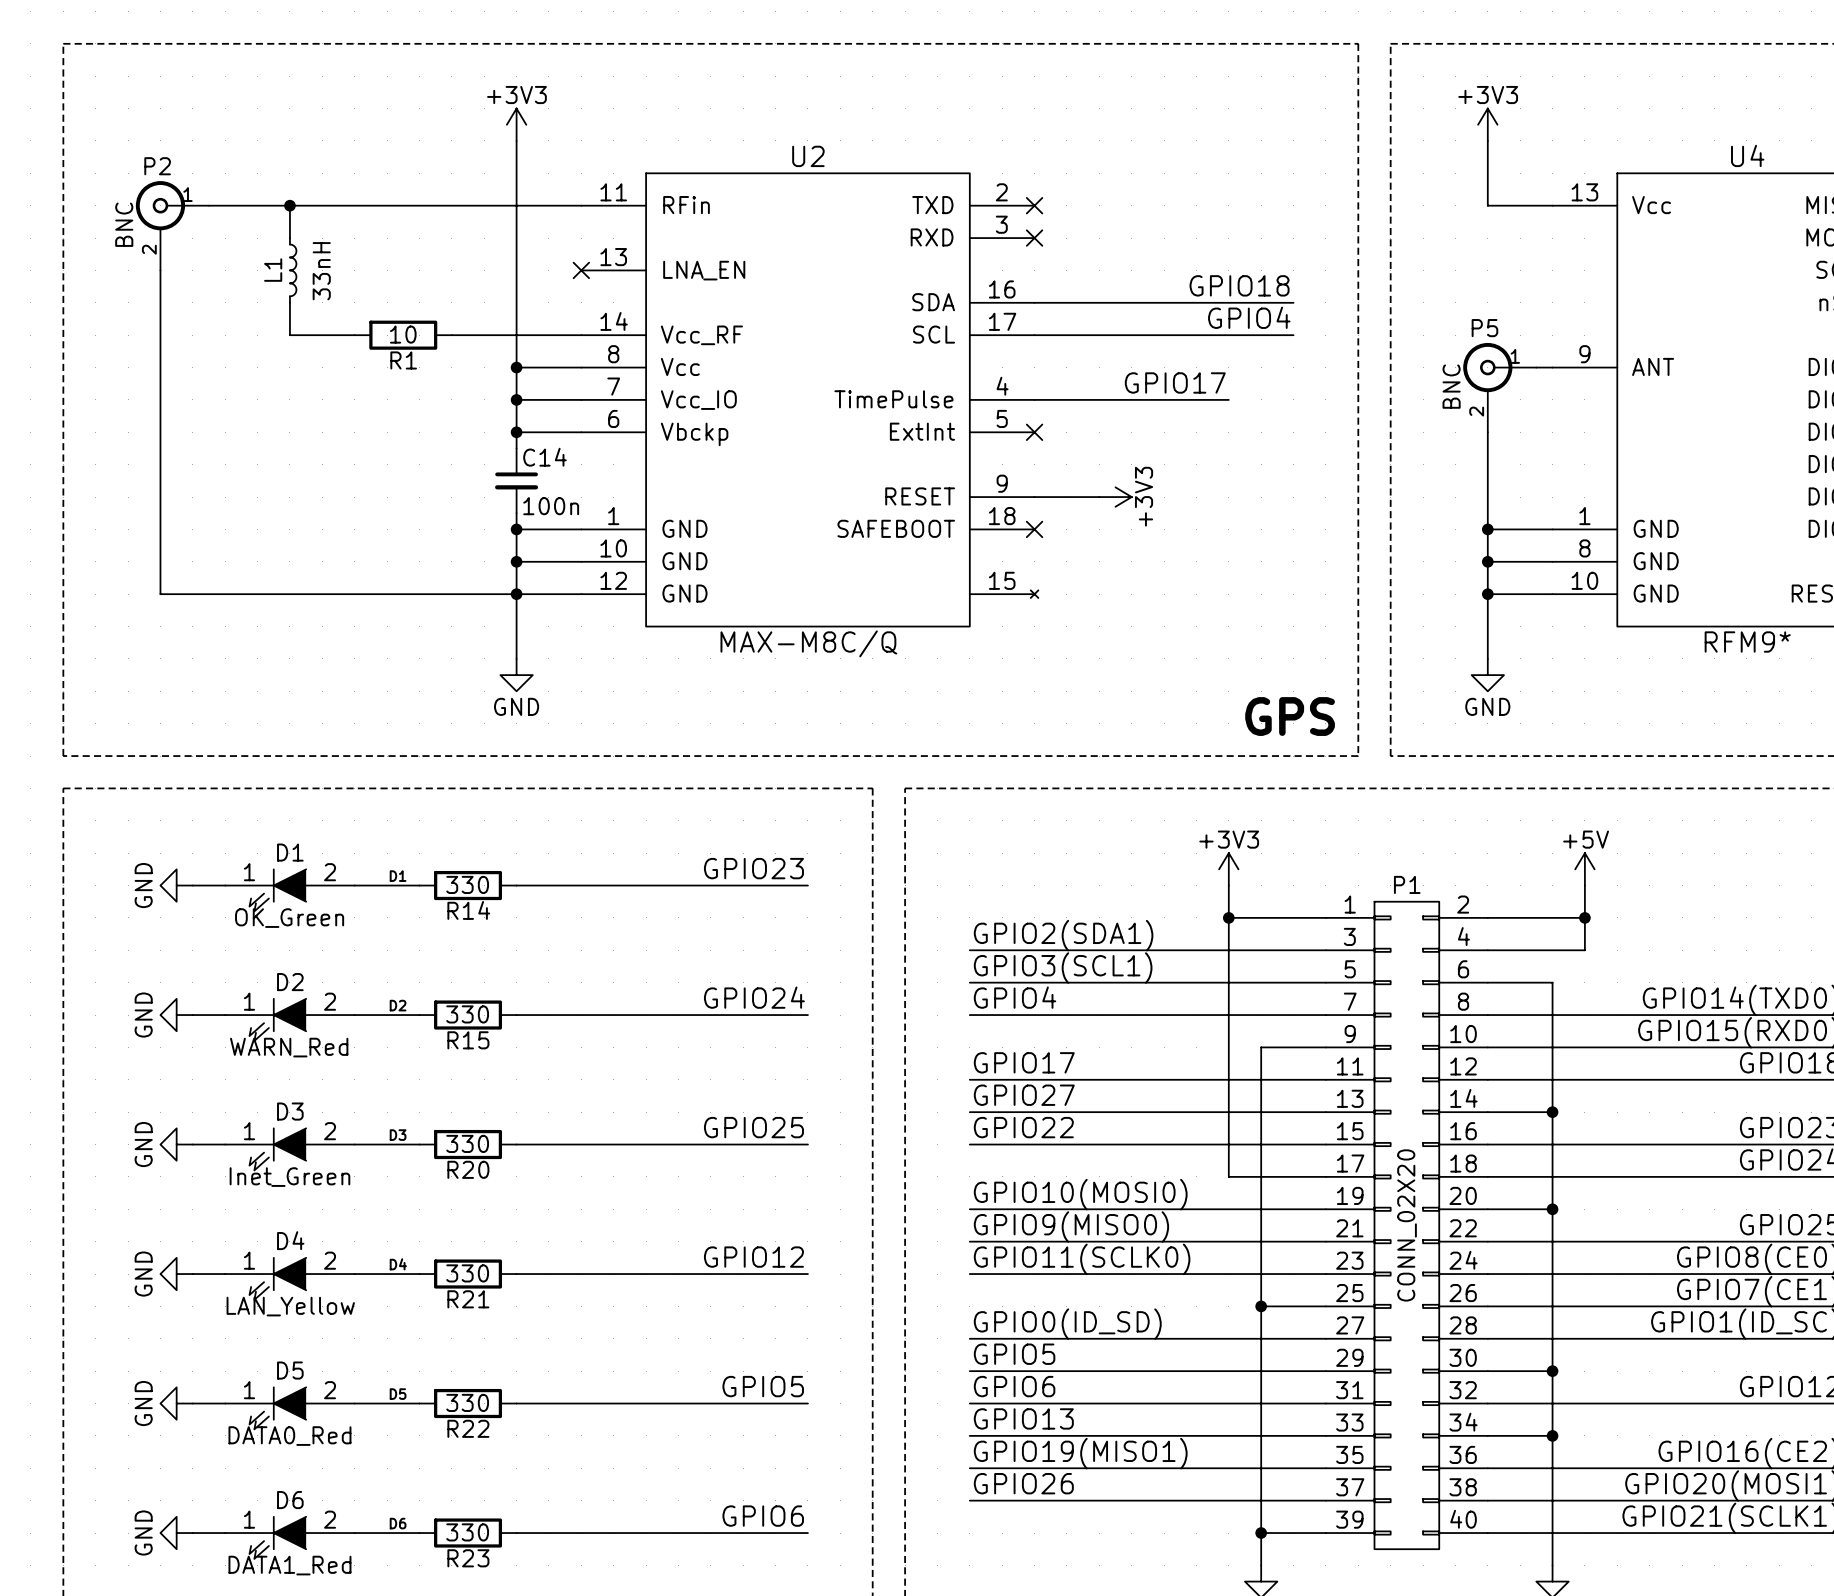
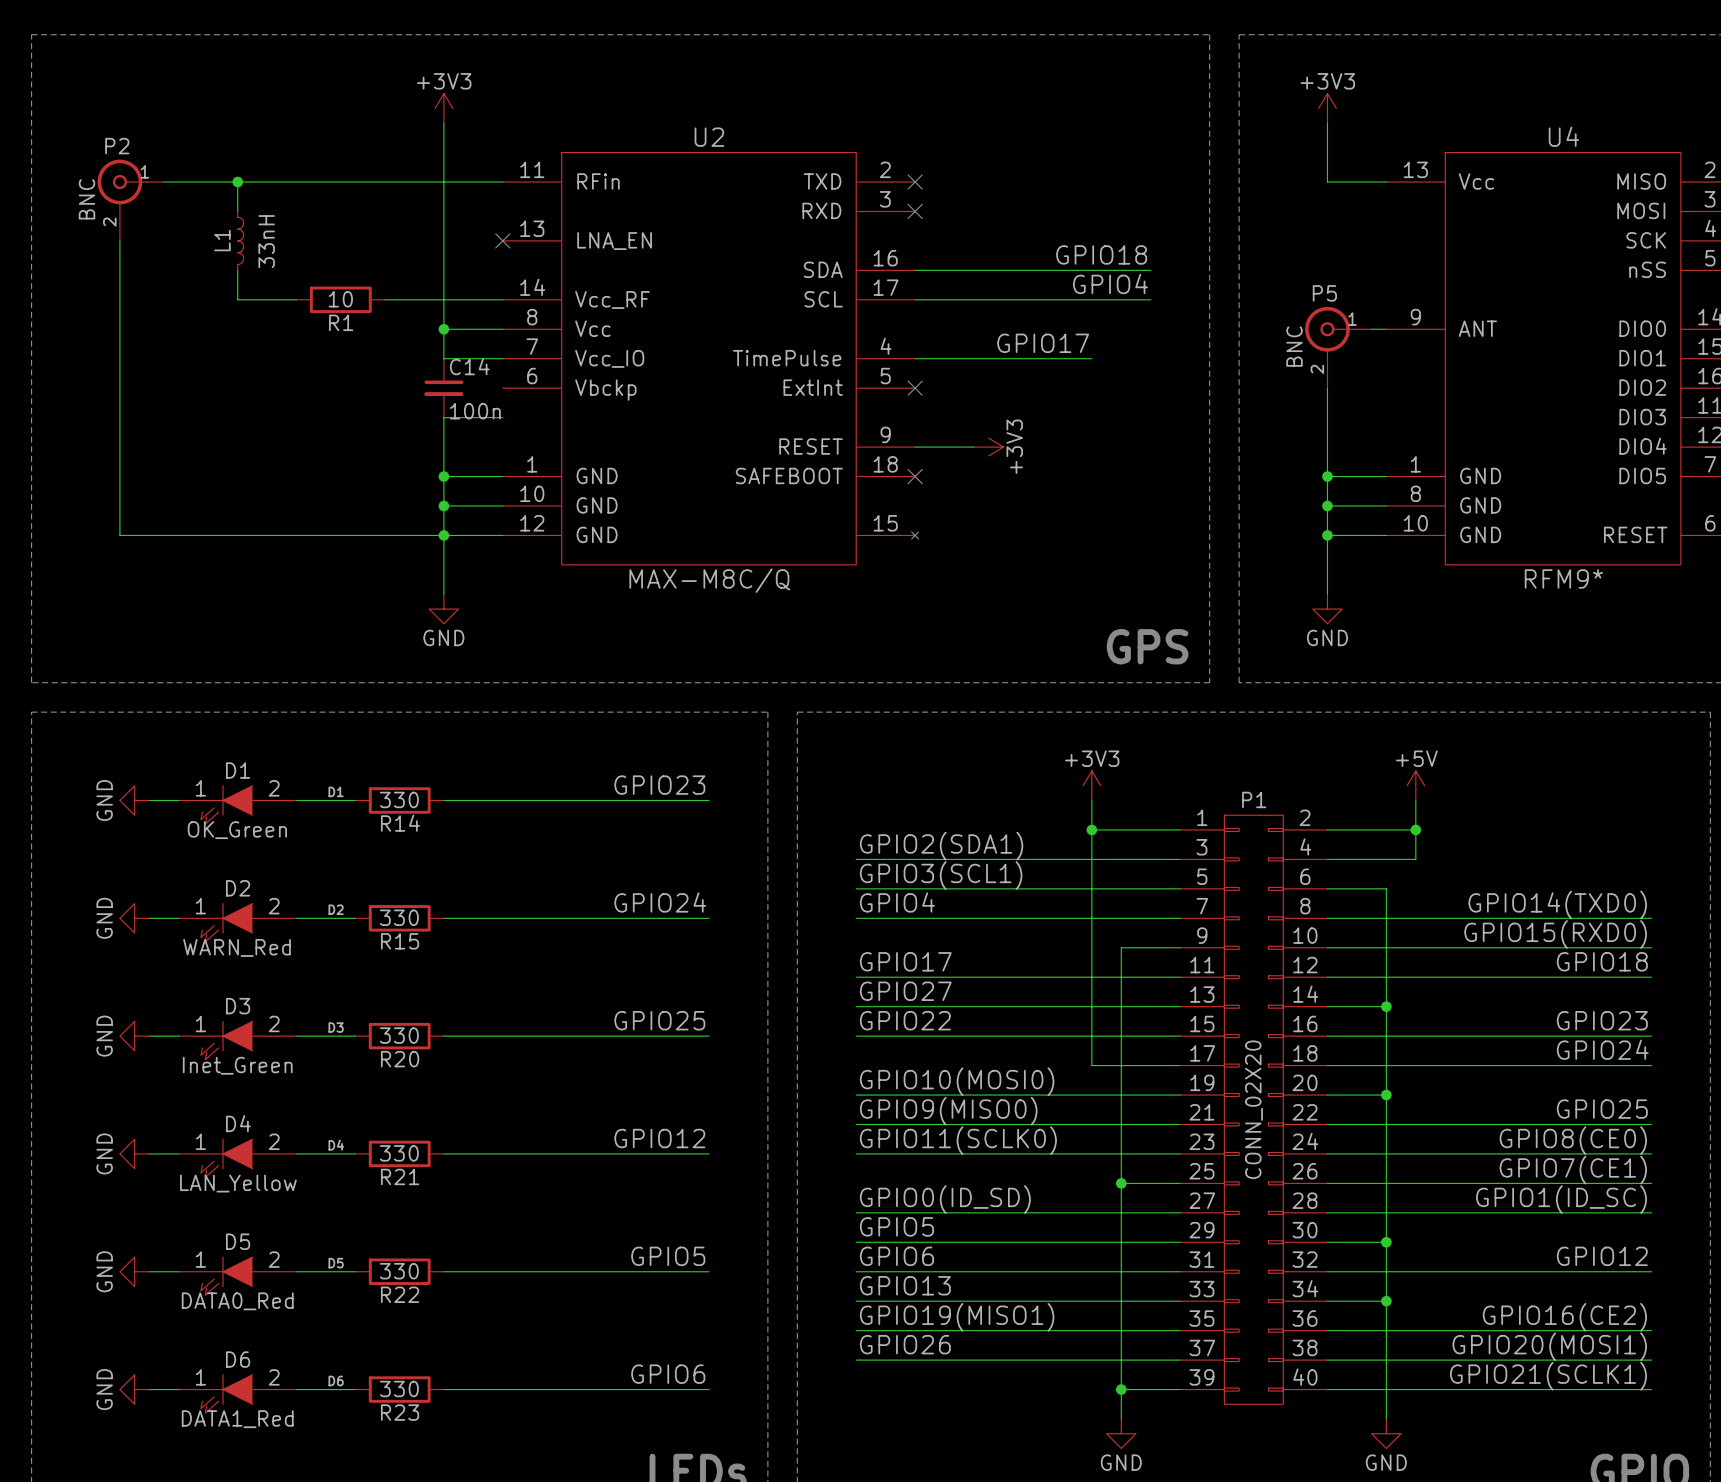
junction: (516, 399) -> none
wire: (516, 432) (581, 432) -> none
junction: (516, 432) -> none
wire: none -> (502, 417) (443, 417) (443, 461)
C14 position: (516, 480) -> (443, 388)

